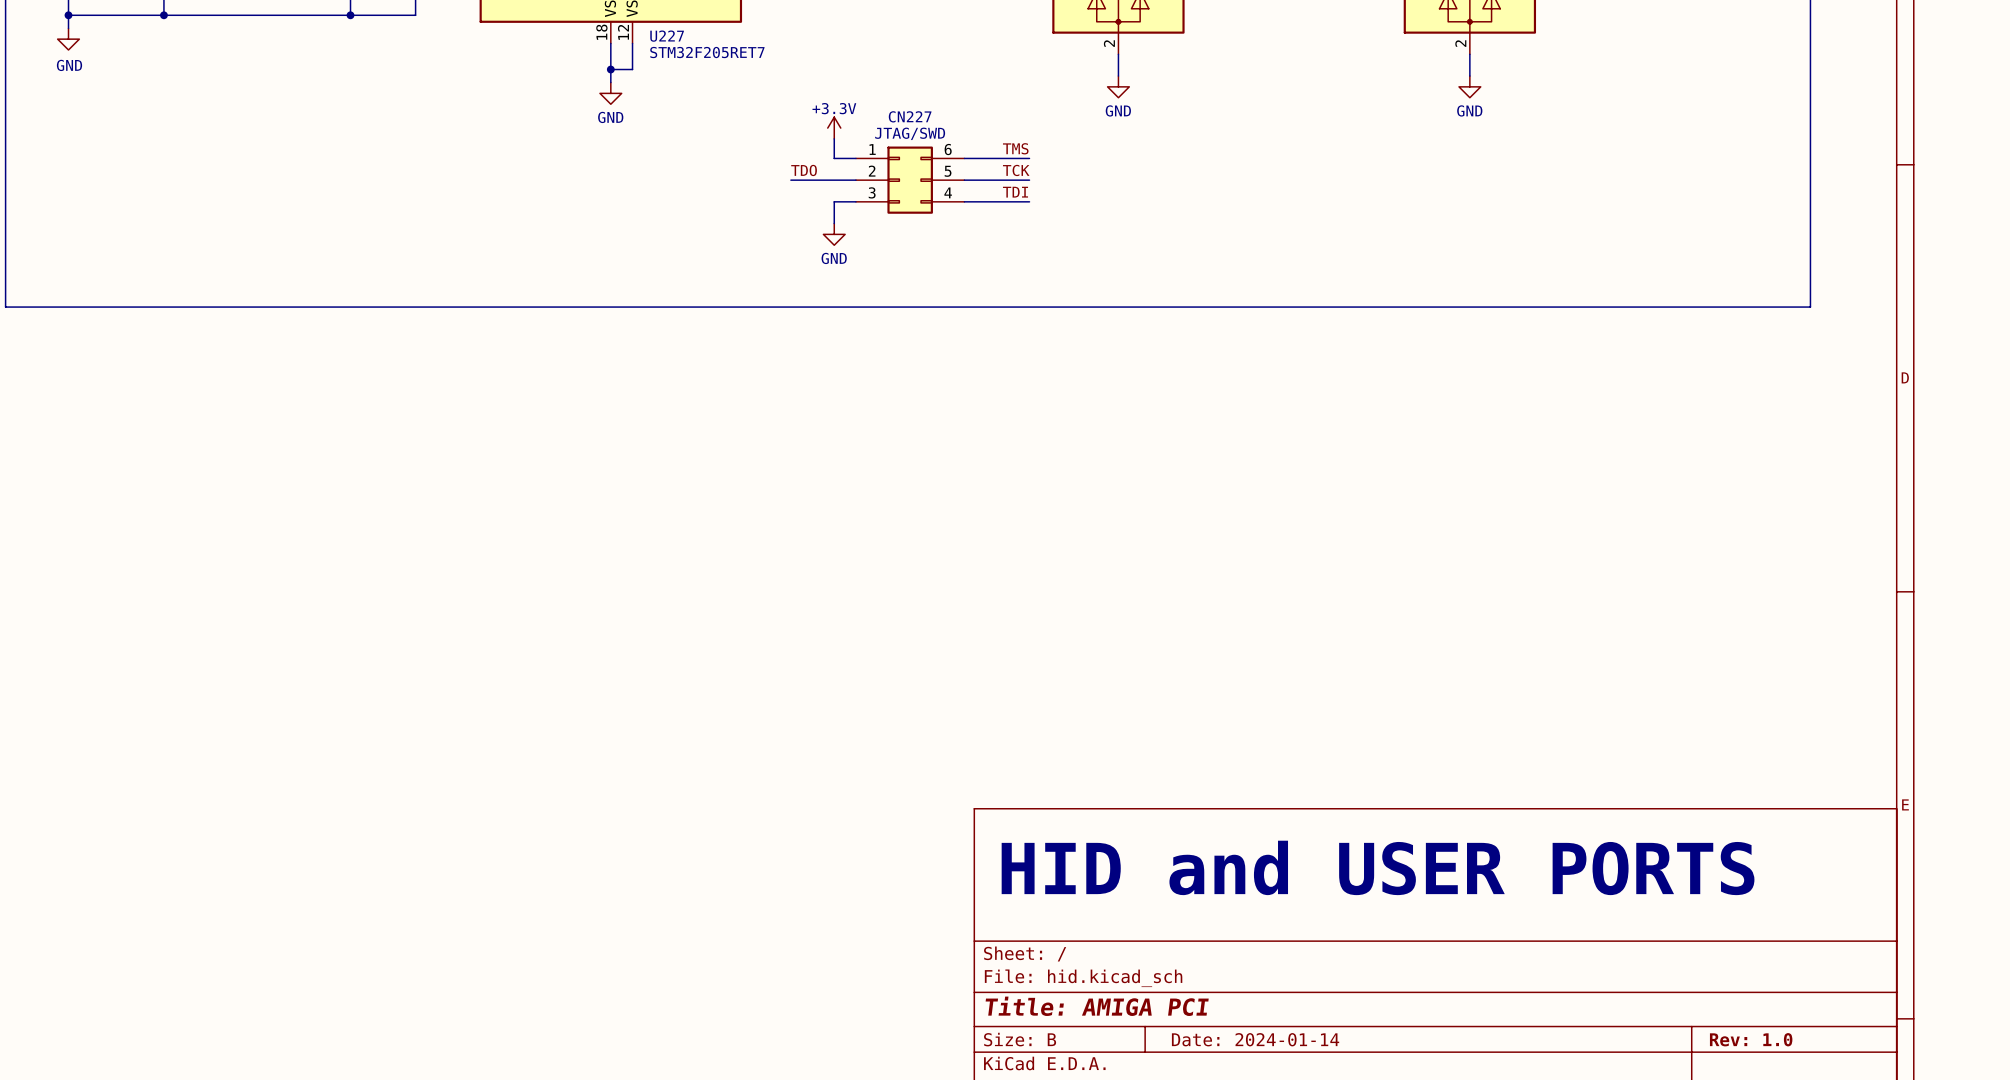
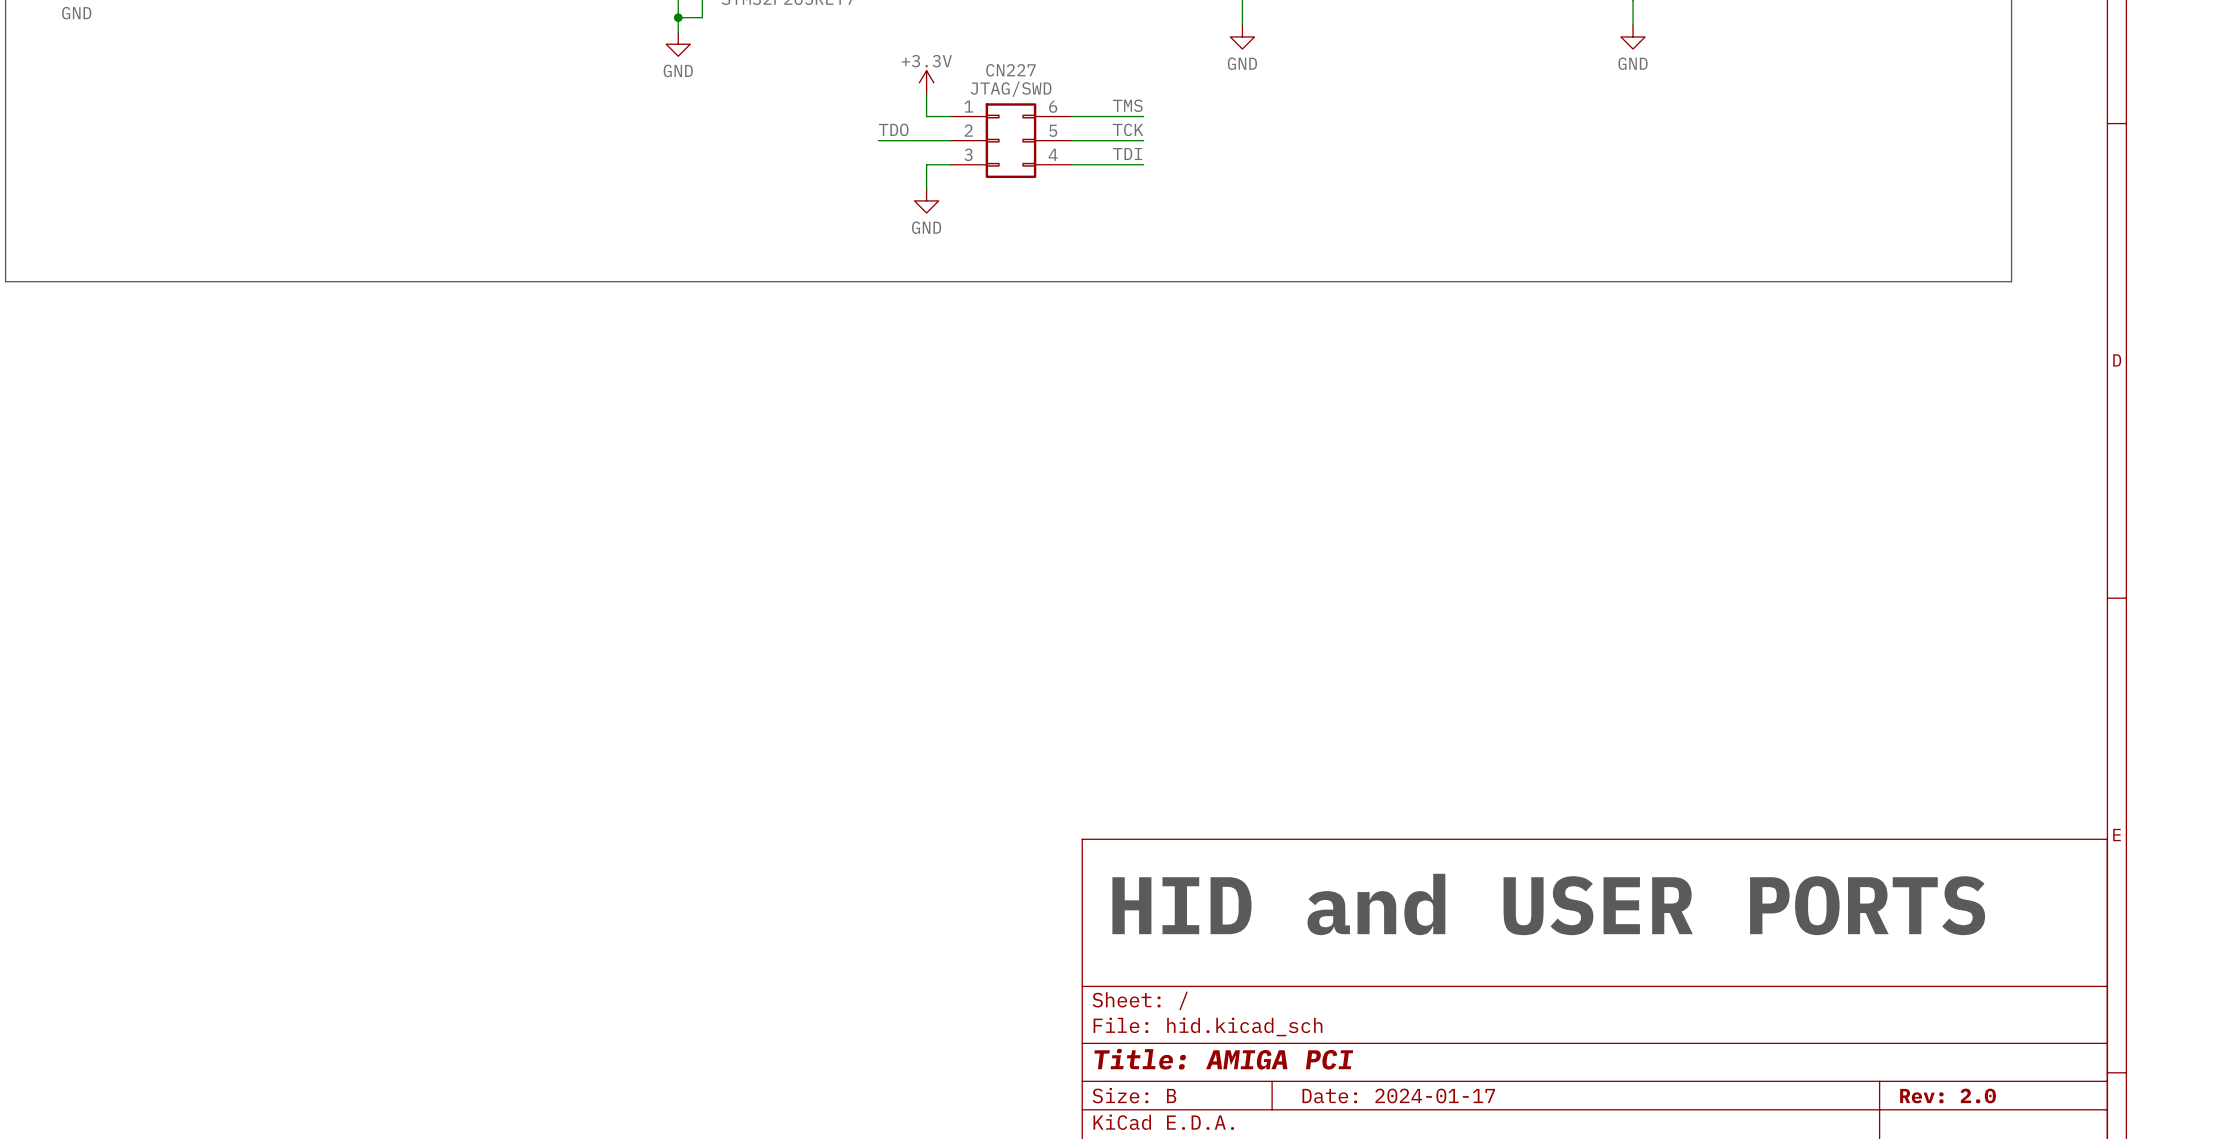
title block: Date: 2024-01-14 (1255, 1039) -> Date: 2024-01-17 (1398, 1096)
title block: Rev: 1.0 (1751, 1039) -> Rev: 2.0 (1948, 1096)

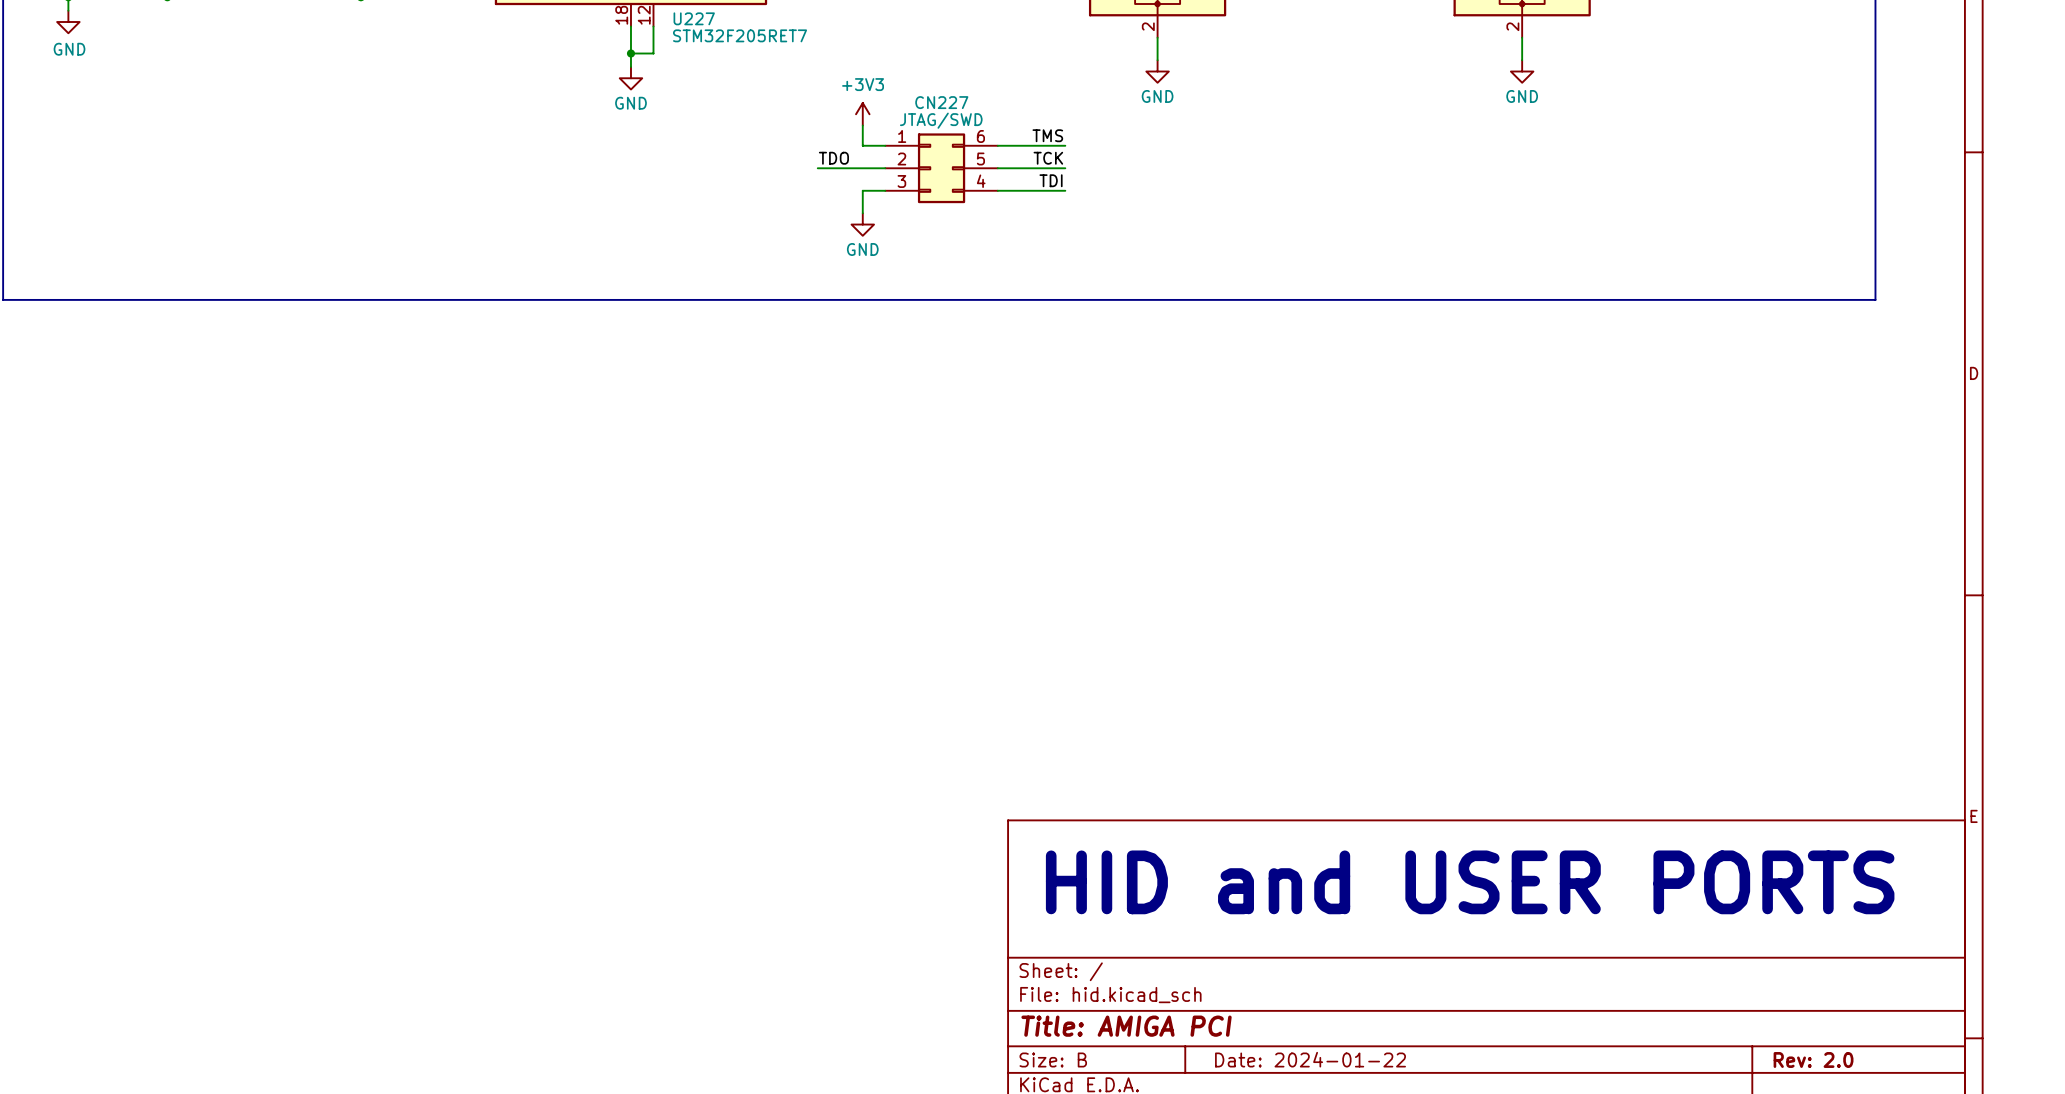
power symbol: +3.3V (926, 82) -> +3V3 (862, 114)
title block: Date: 2024-01-17 (1398, 1096) -> Date: 2024-01-22 (1310, 1059)

